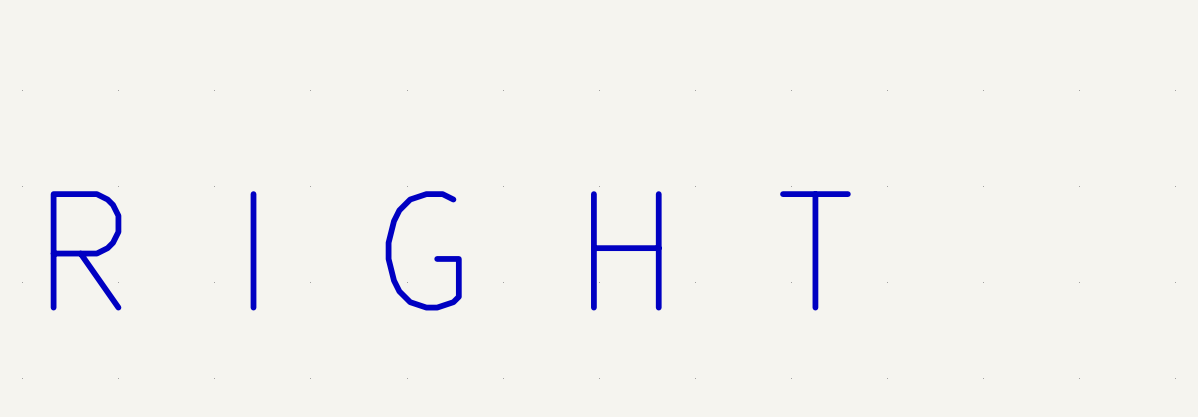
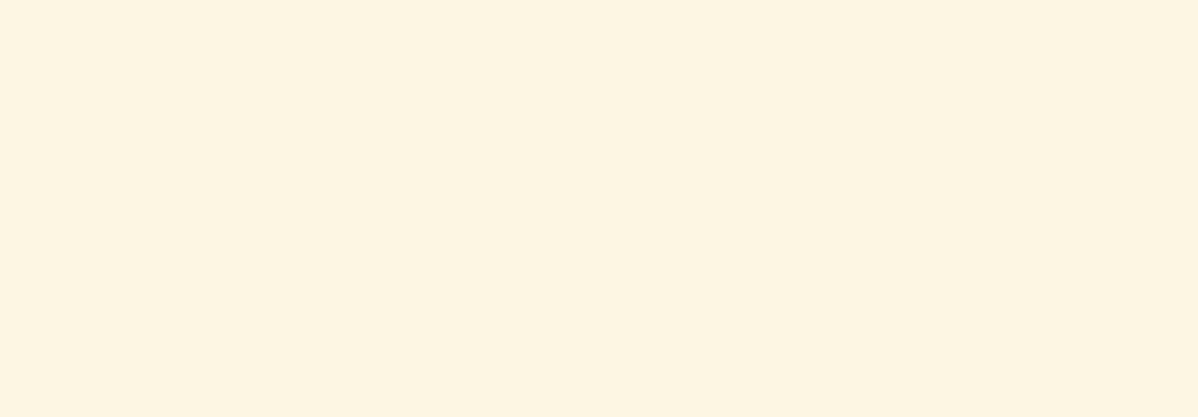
text: R I G H T (450, 250) -> none

